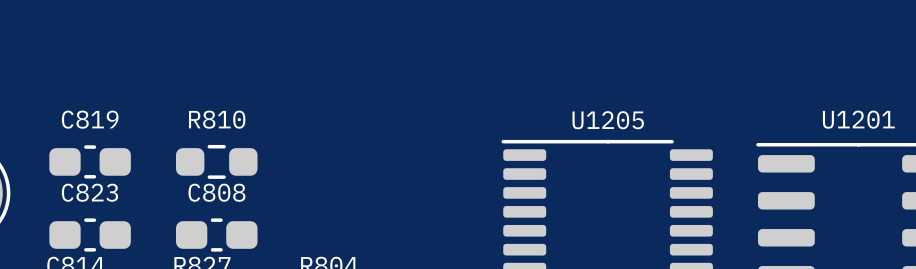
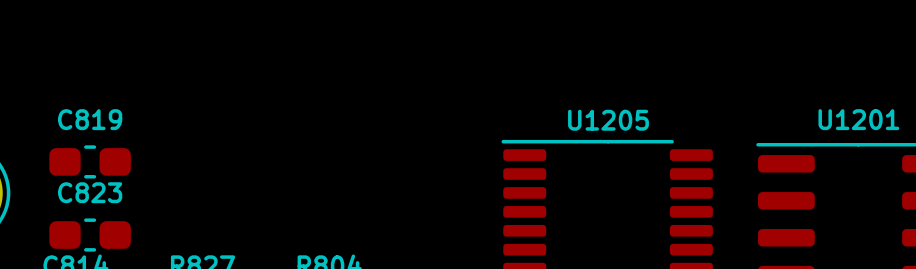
R810: (216, 161) -> none
C808: (216, 235) -> none

